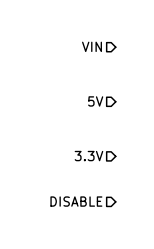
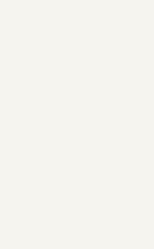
hierarchical label: VIN (92, 46) -> none
hierarchical label: 5V (95, 101) -> none
hierarchical label: 3.3V (88, 156) -> none
hierarchical label: DISABLE (76, 201) -> none

